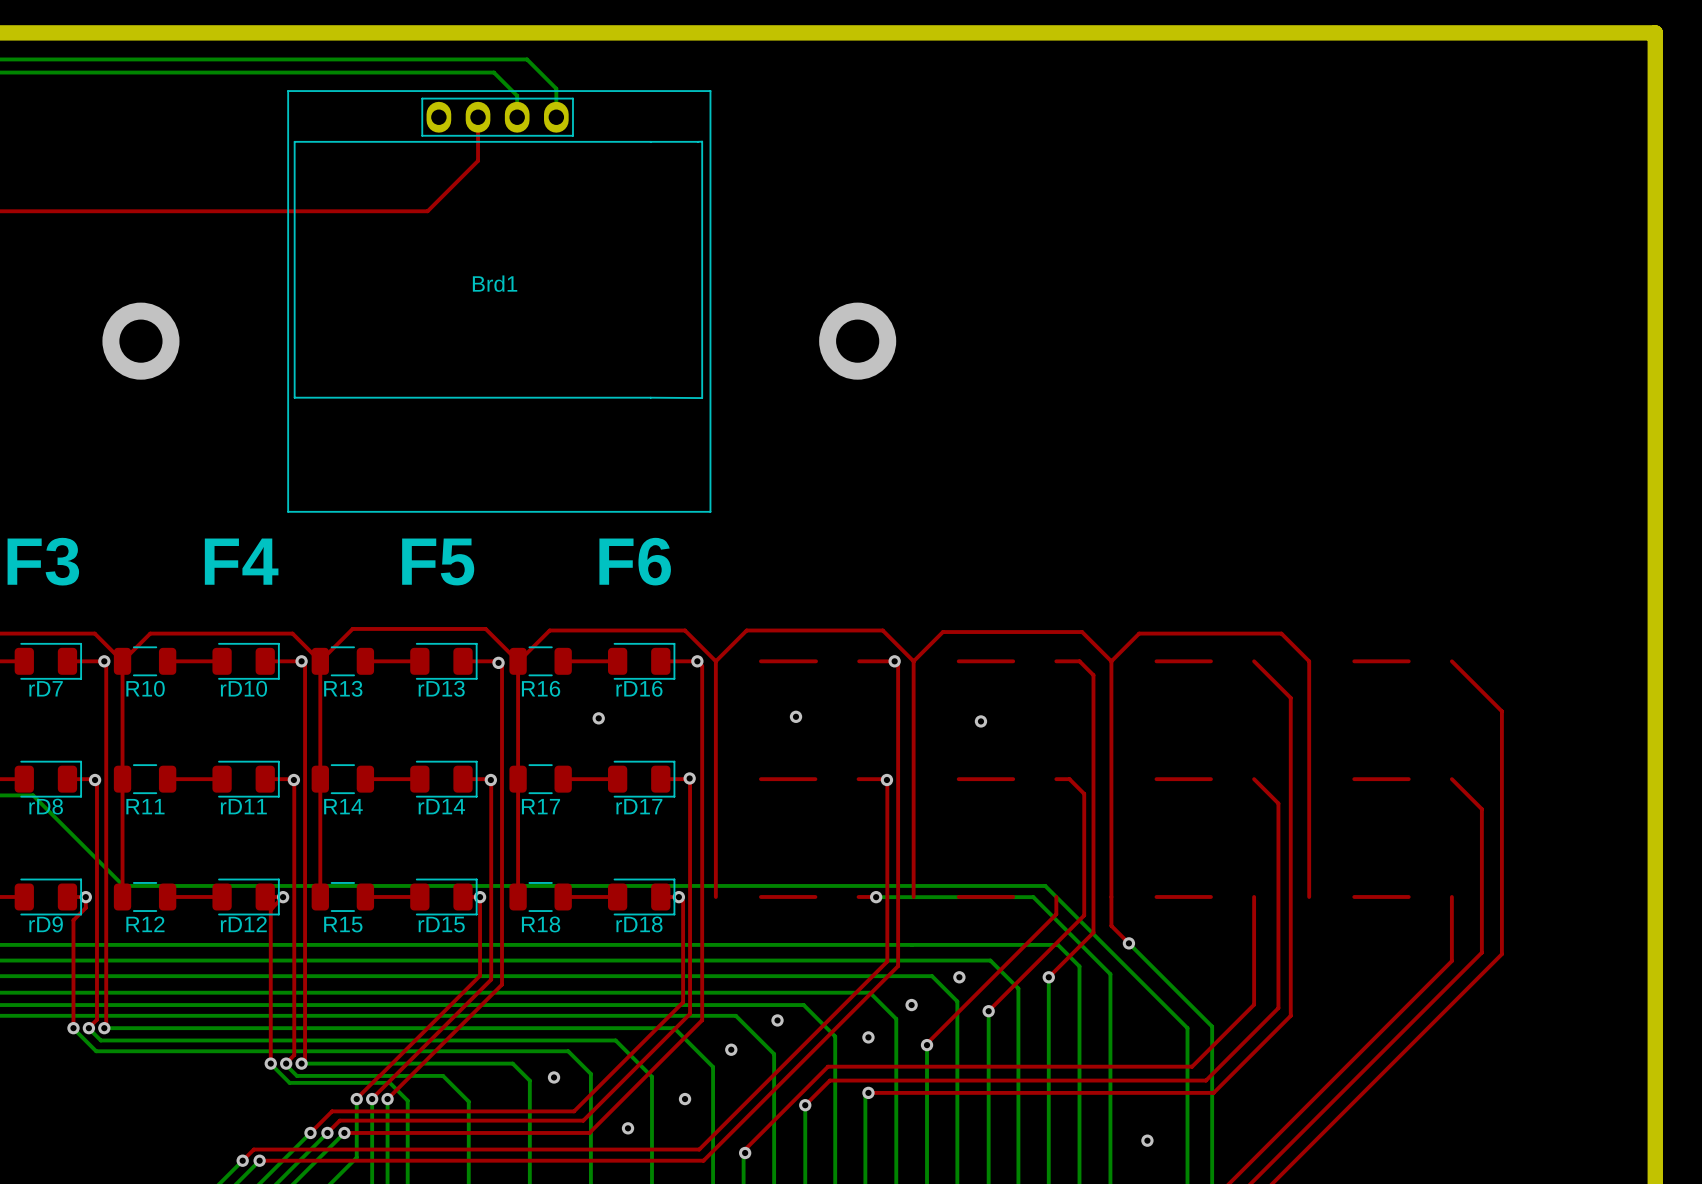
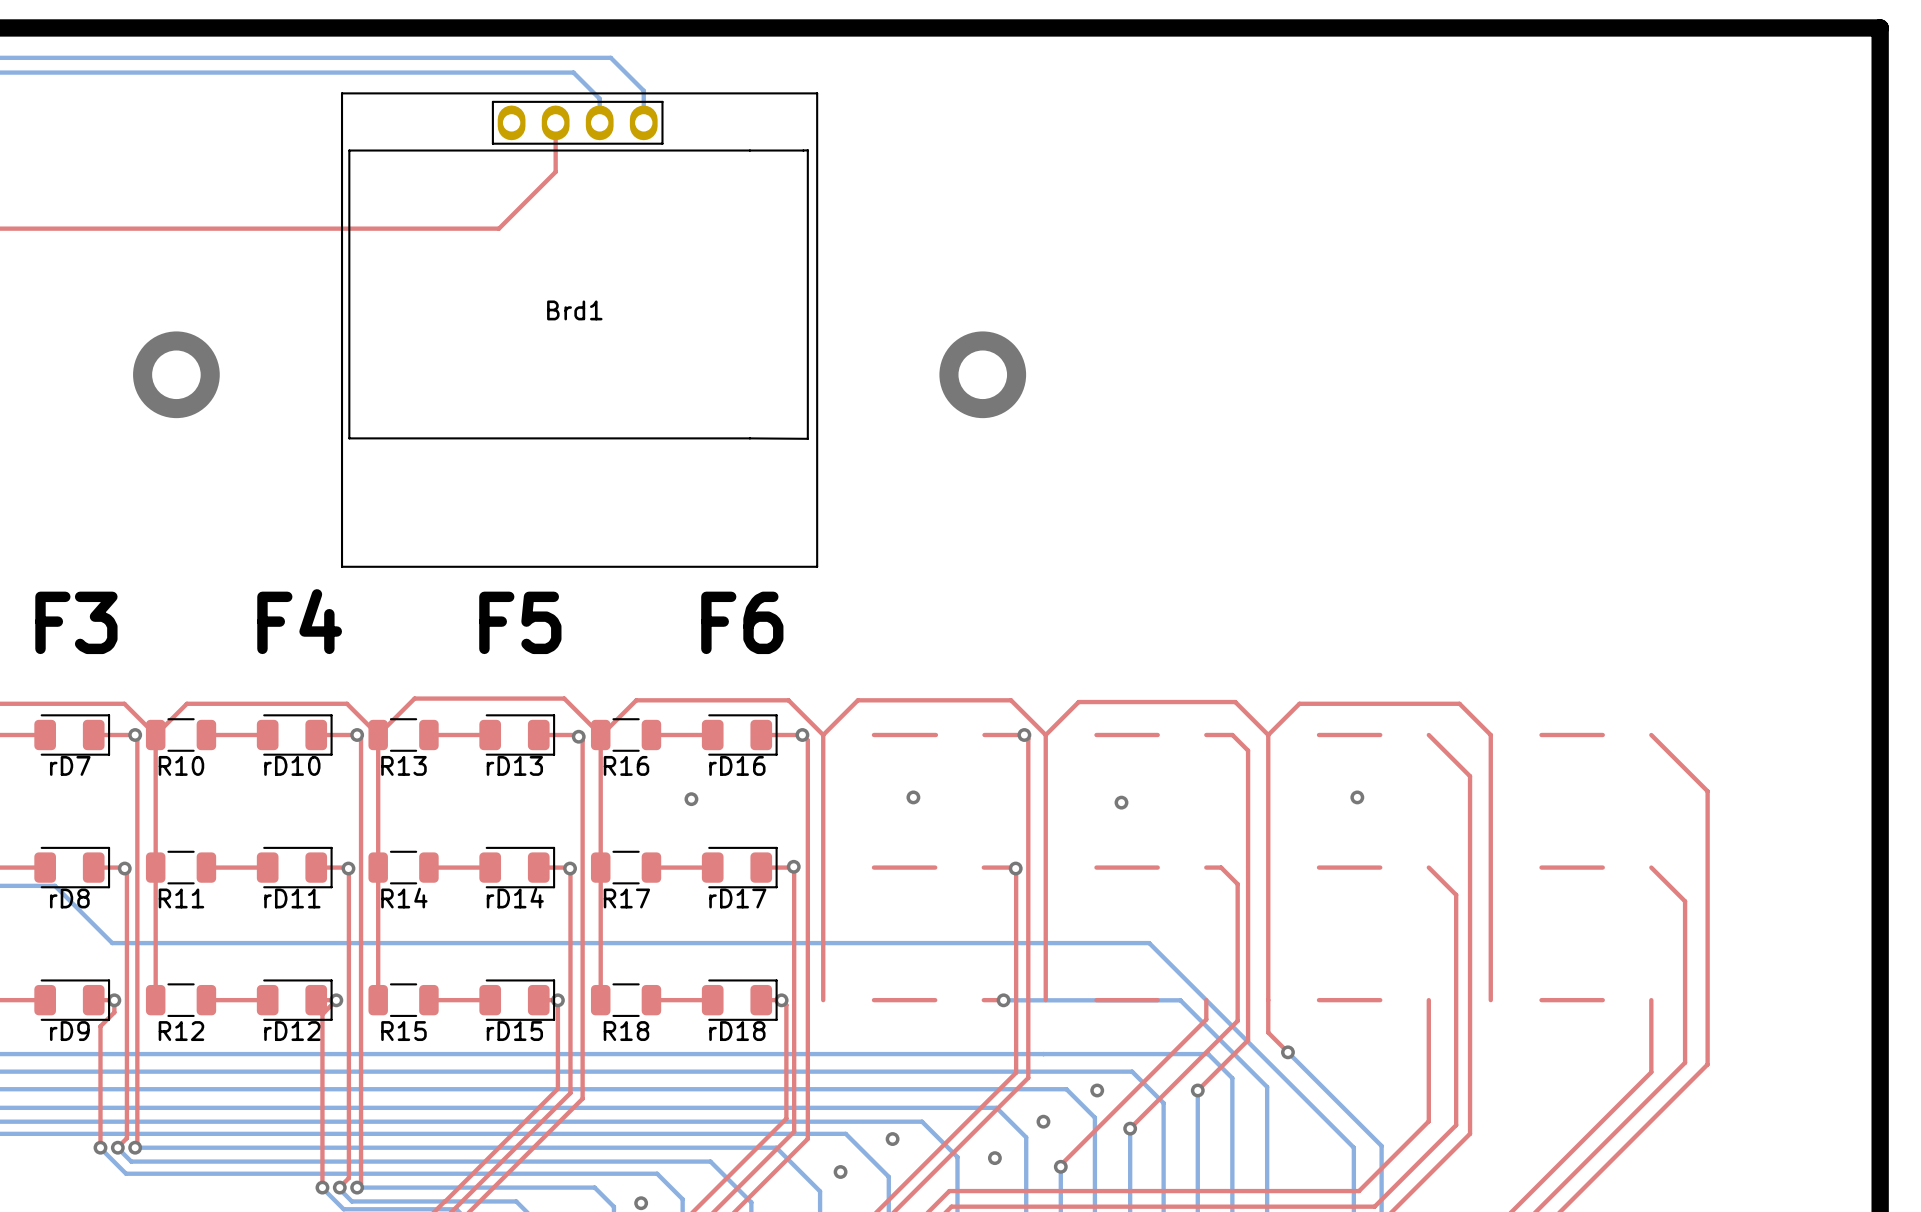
via: none -> (1357, 797)
bottom track: (83, 846) (123, 885) (1045, 885) -> (112, 943) (1149, 943) (1193, 987)

